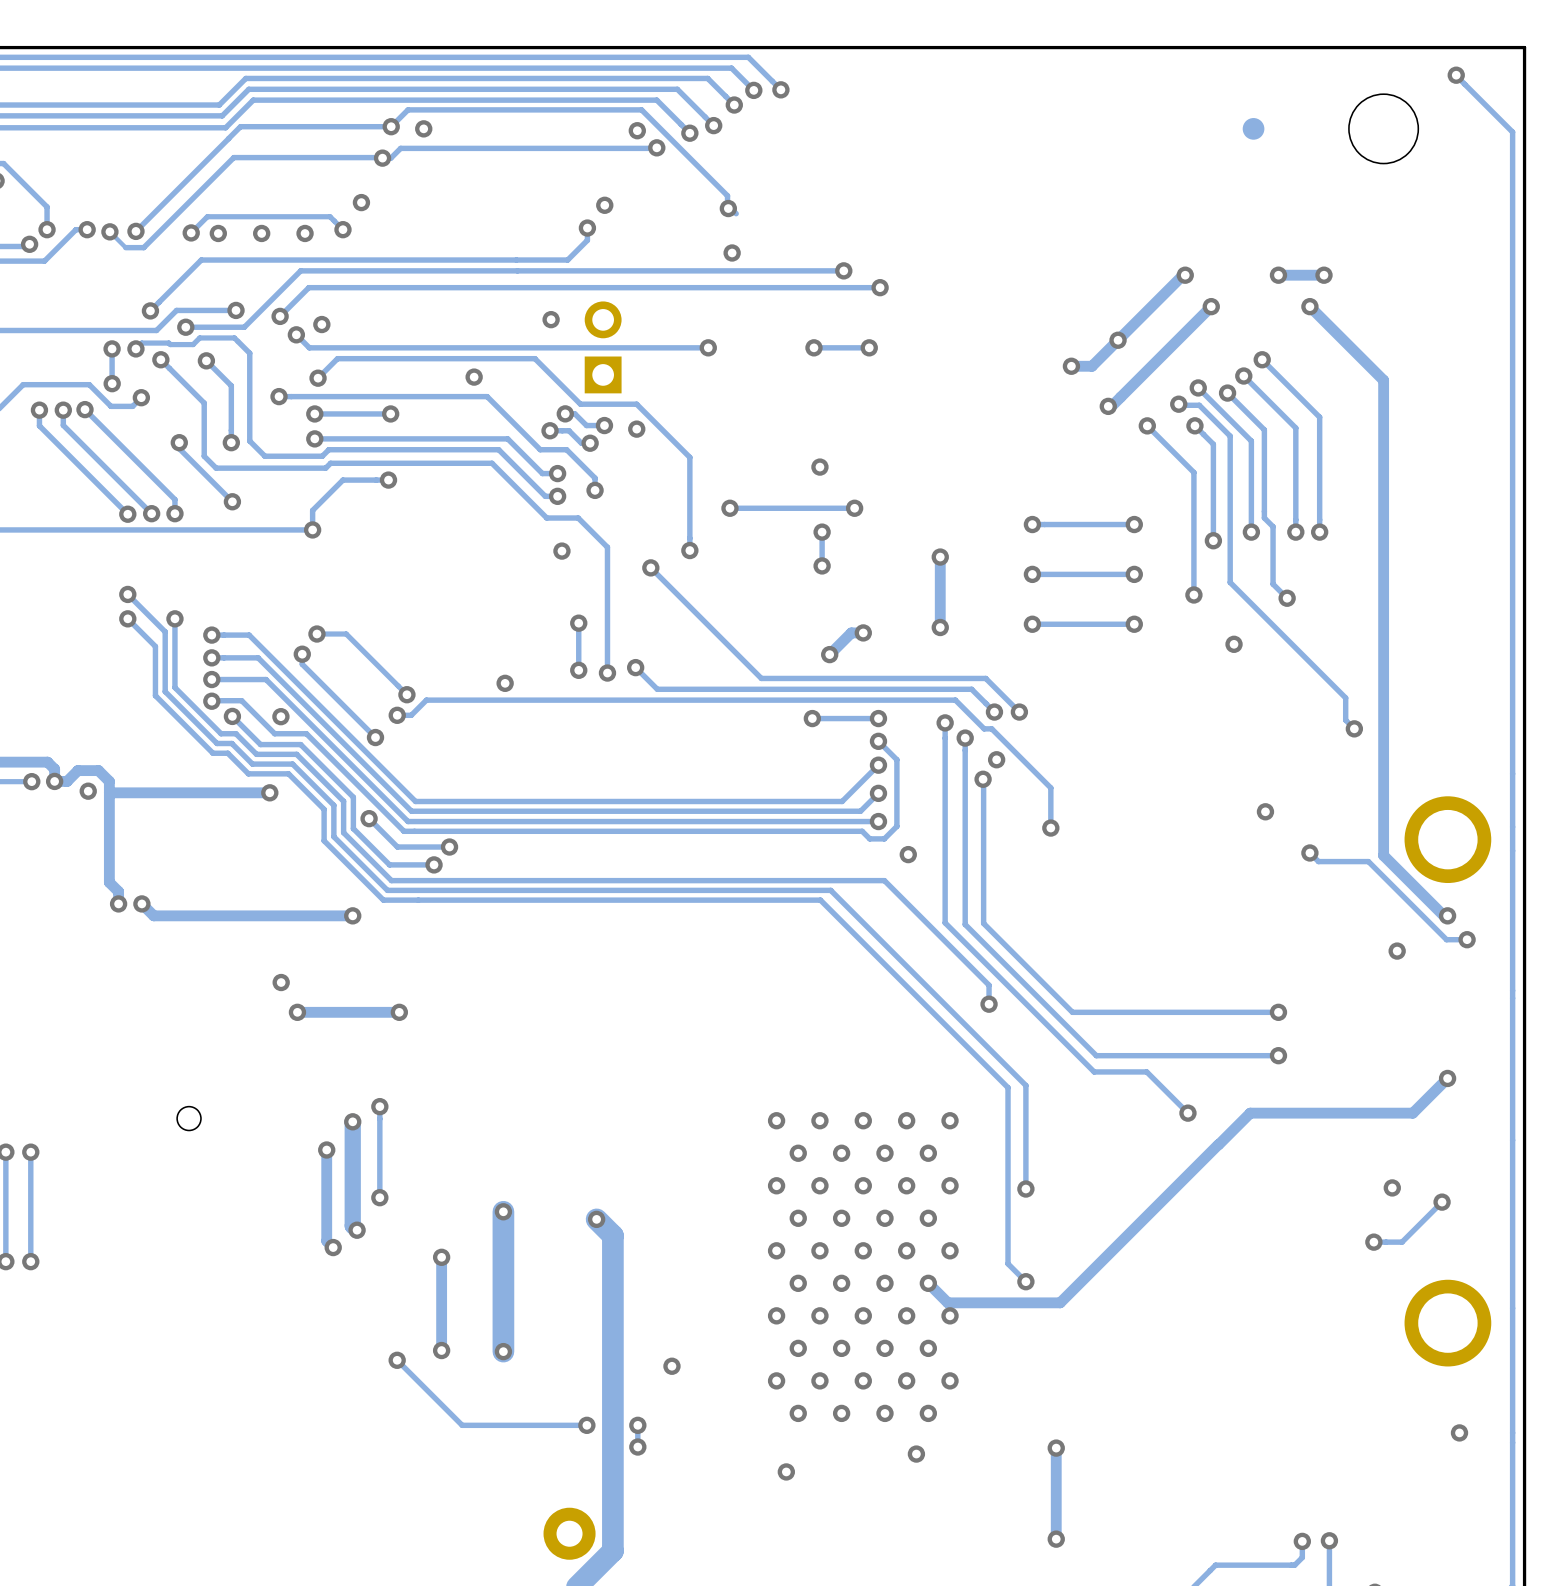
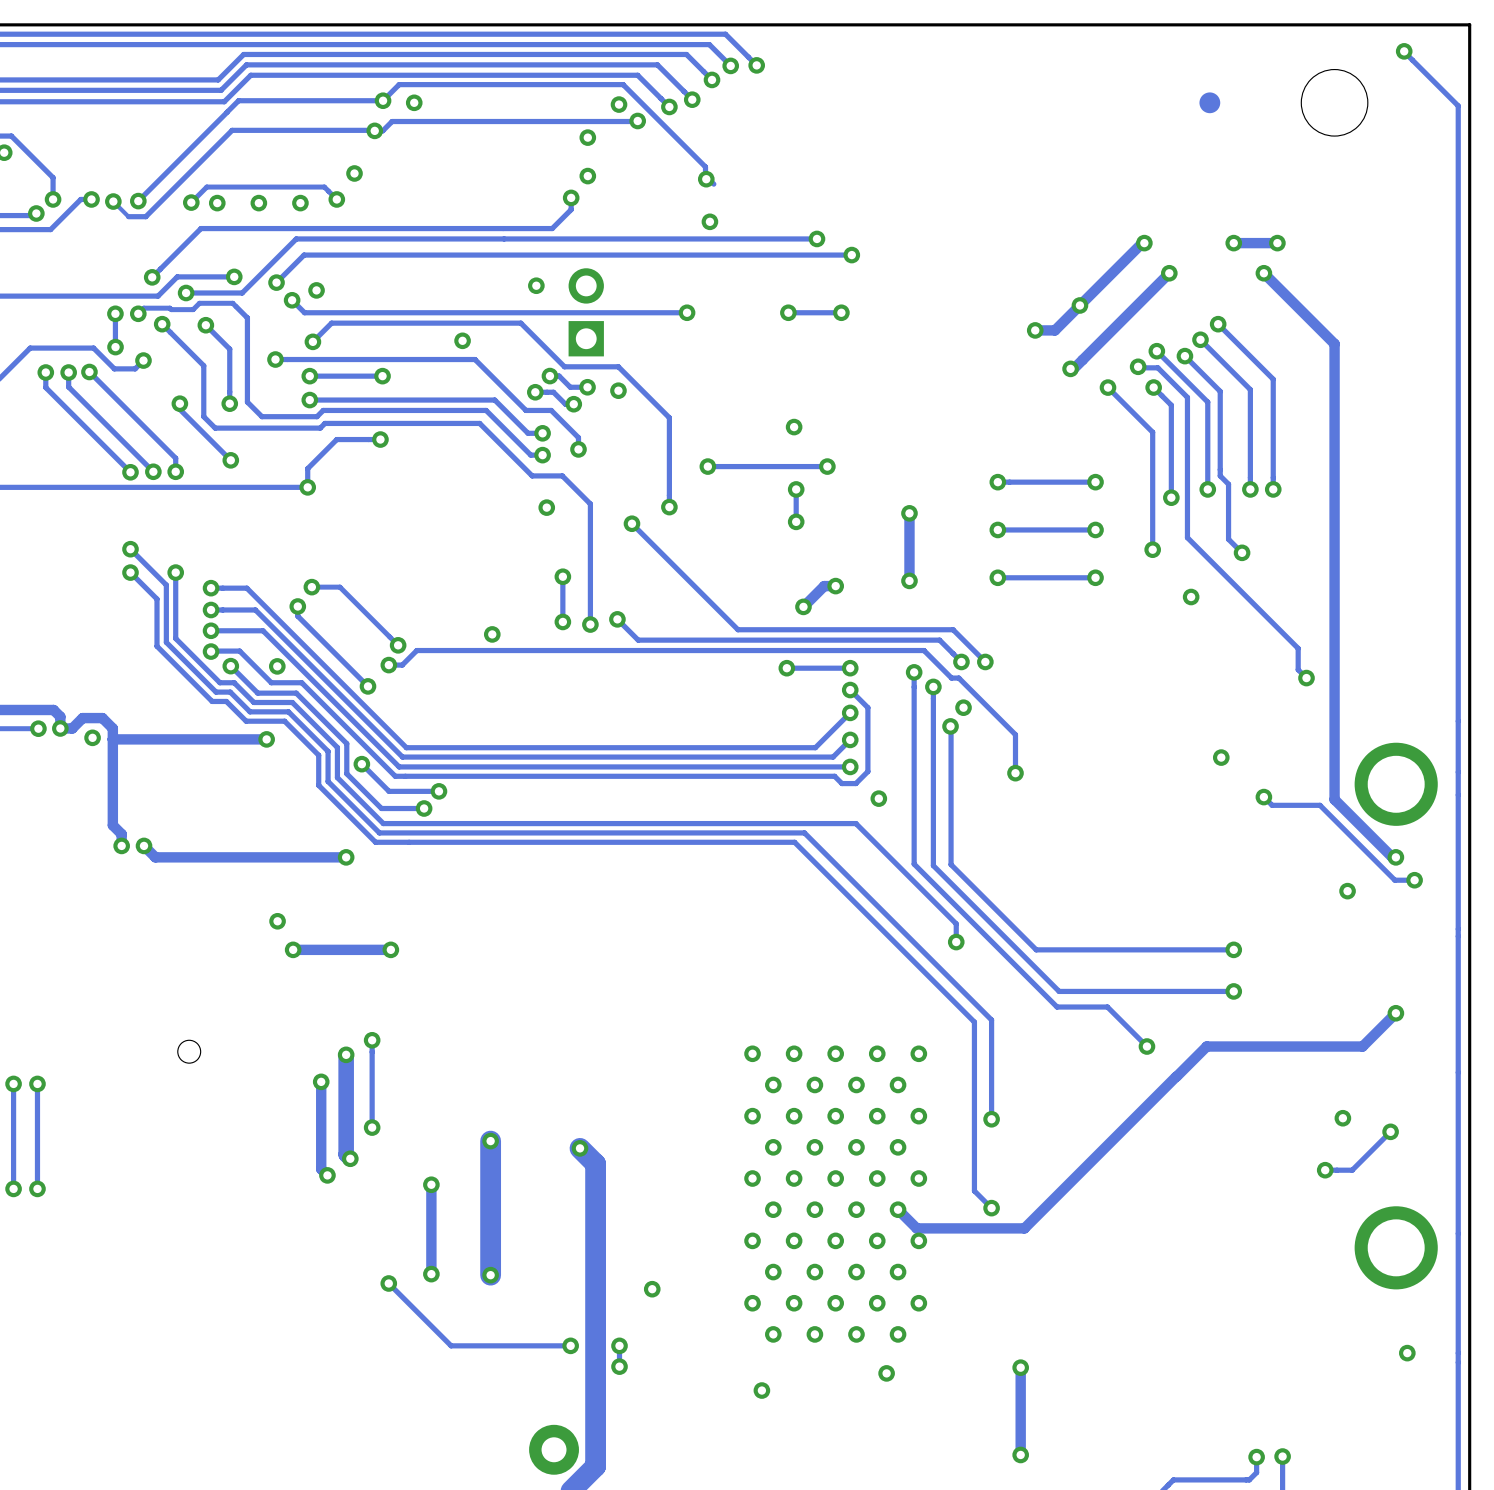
via: none -> (587, 137)

